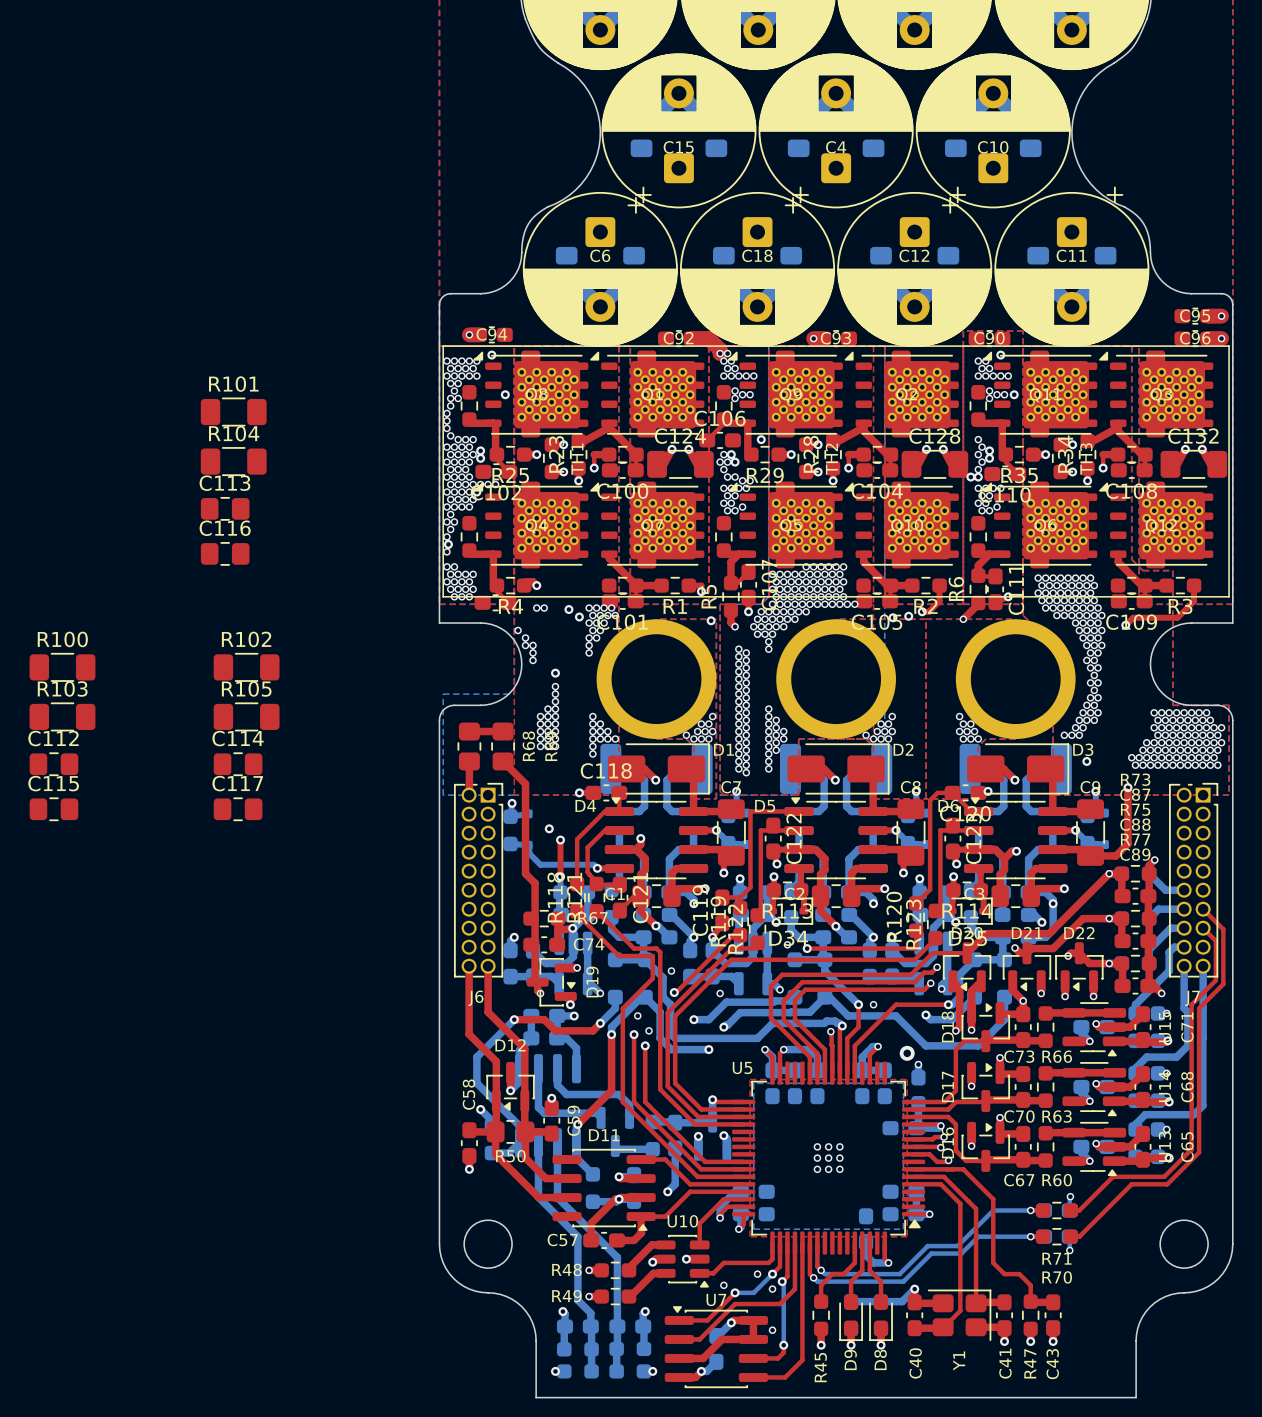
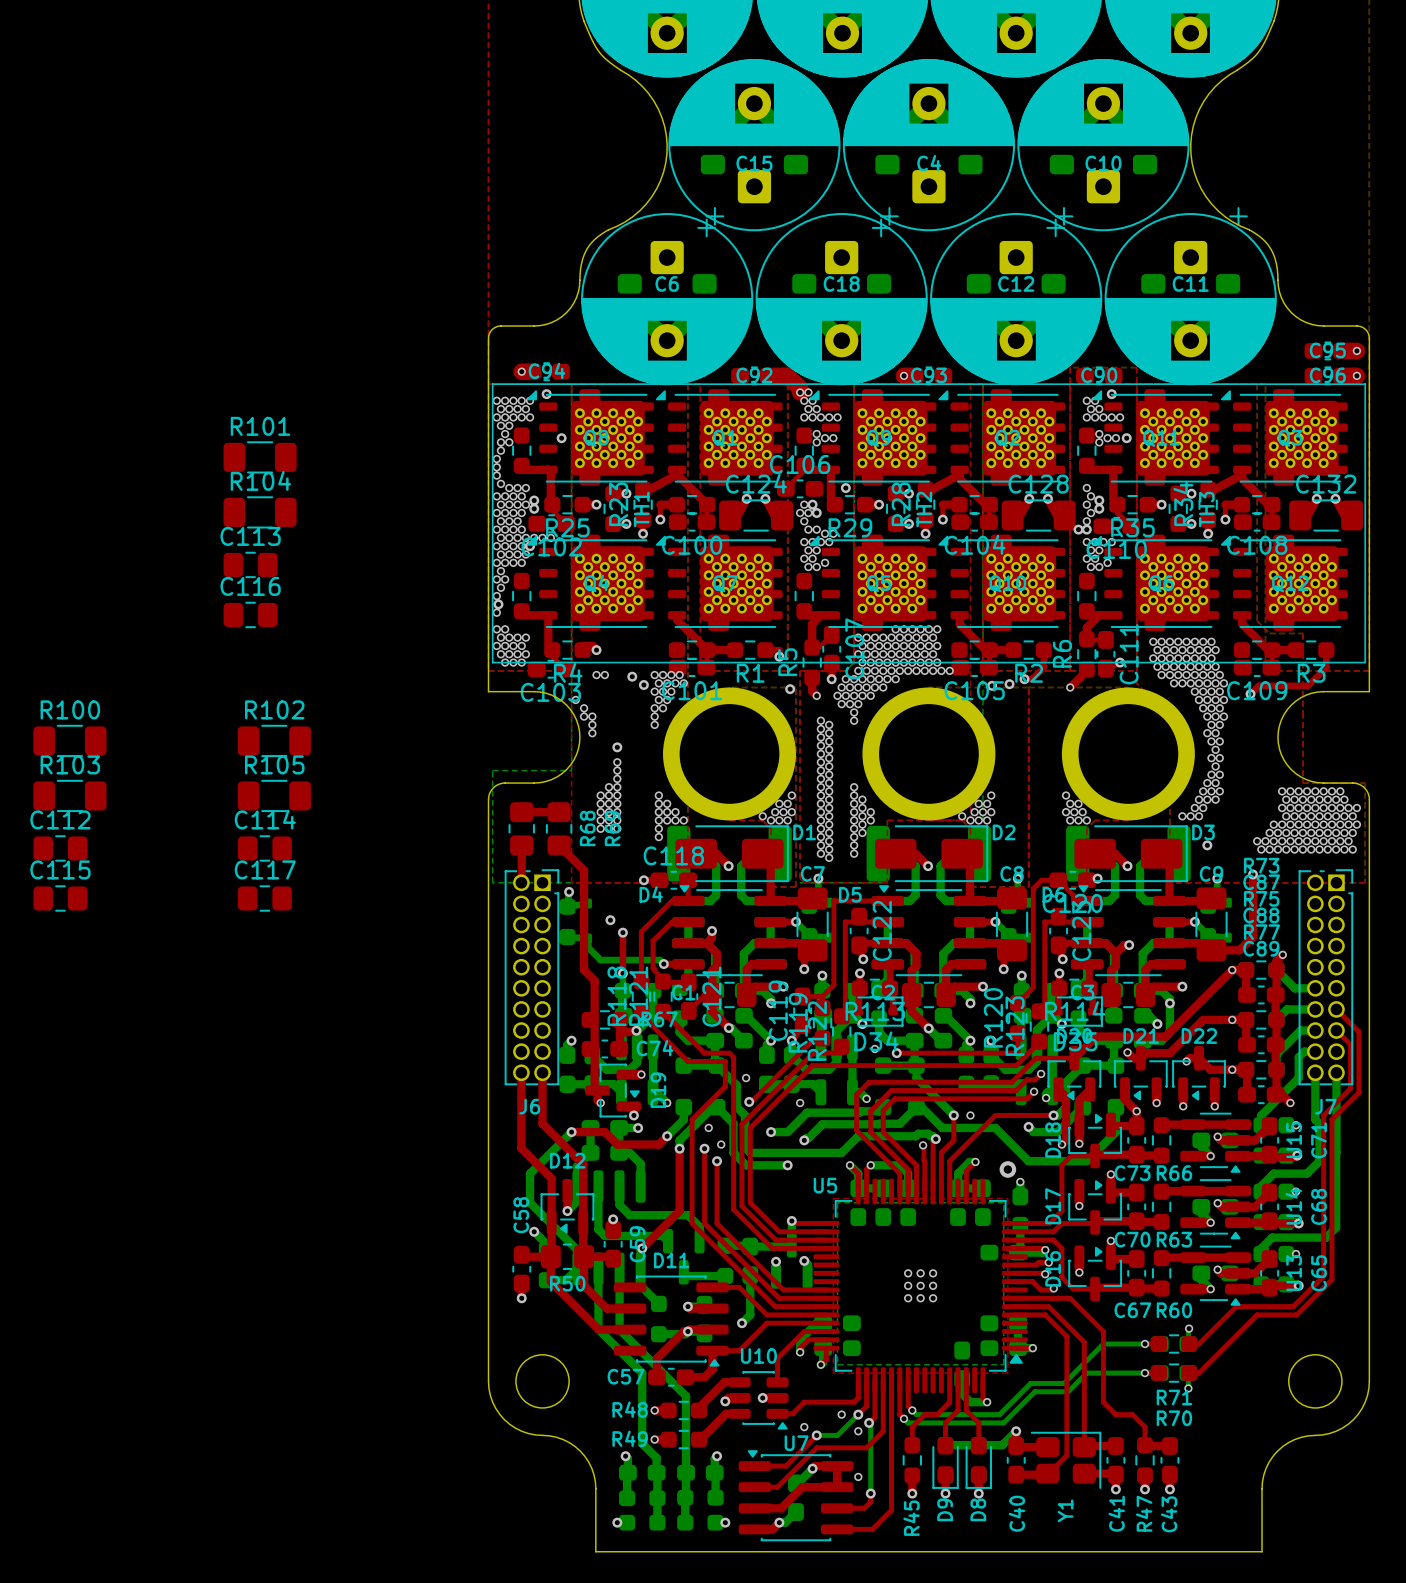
C103 name: none -> C103 (550, 692)

